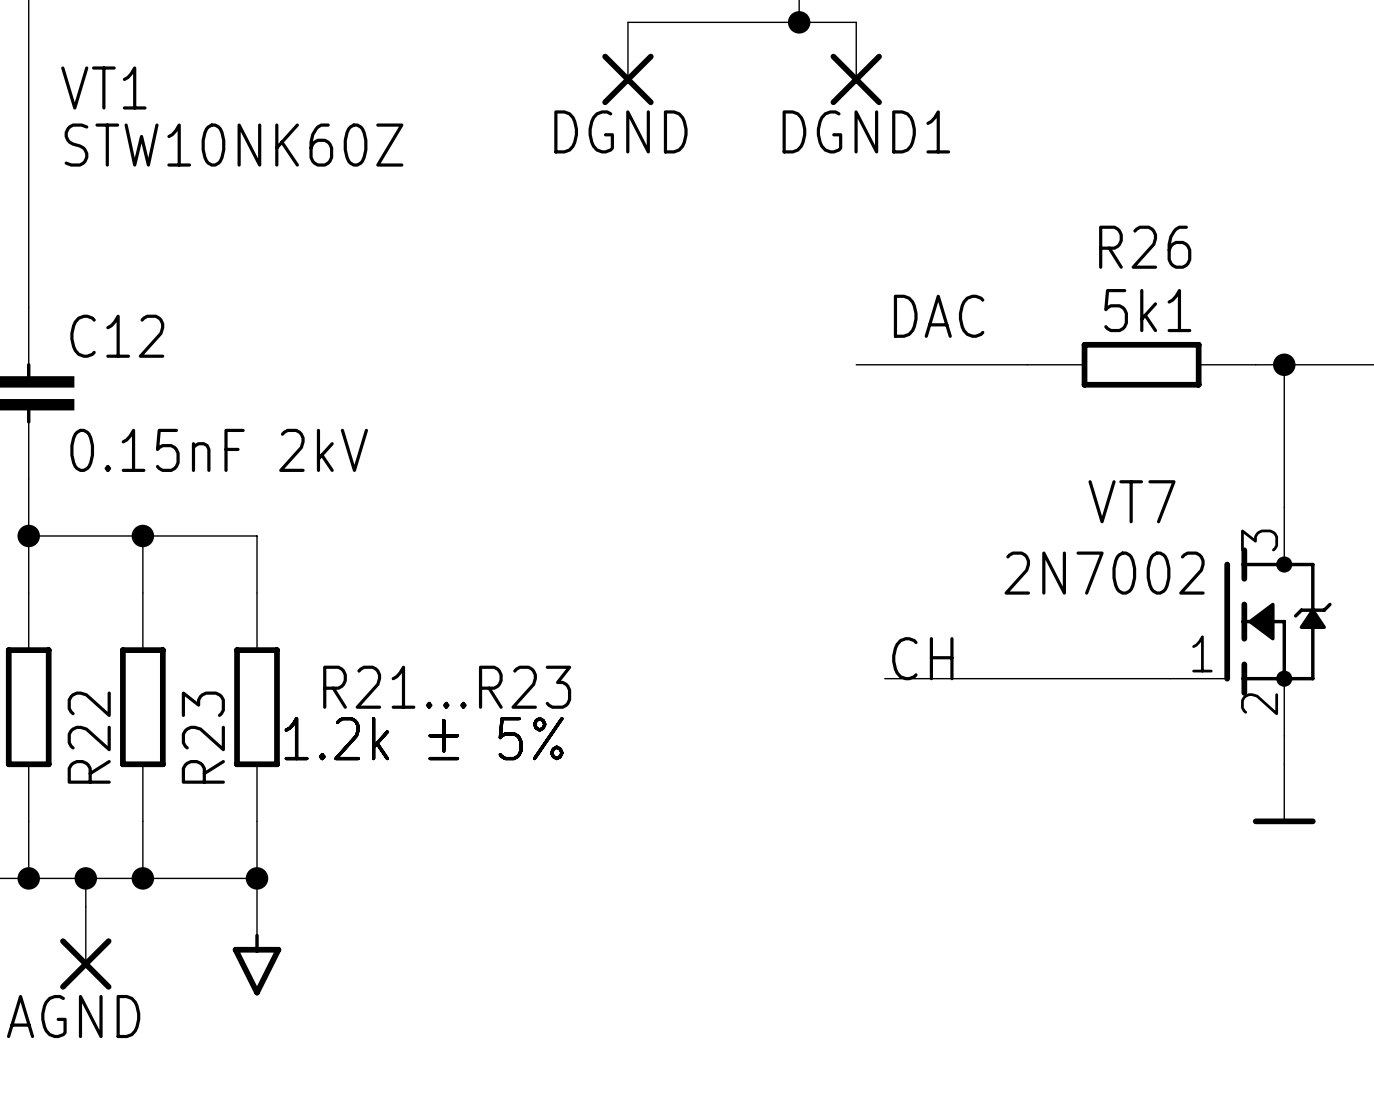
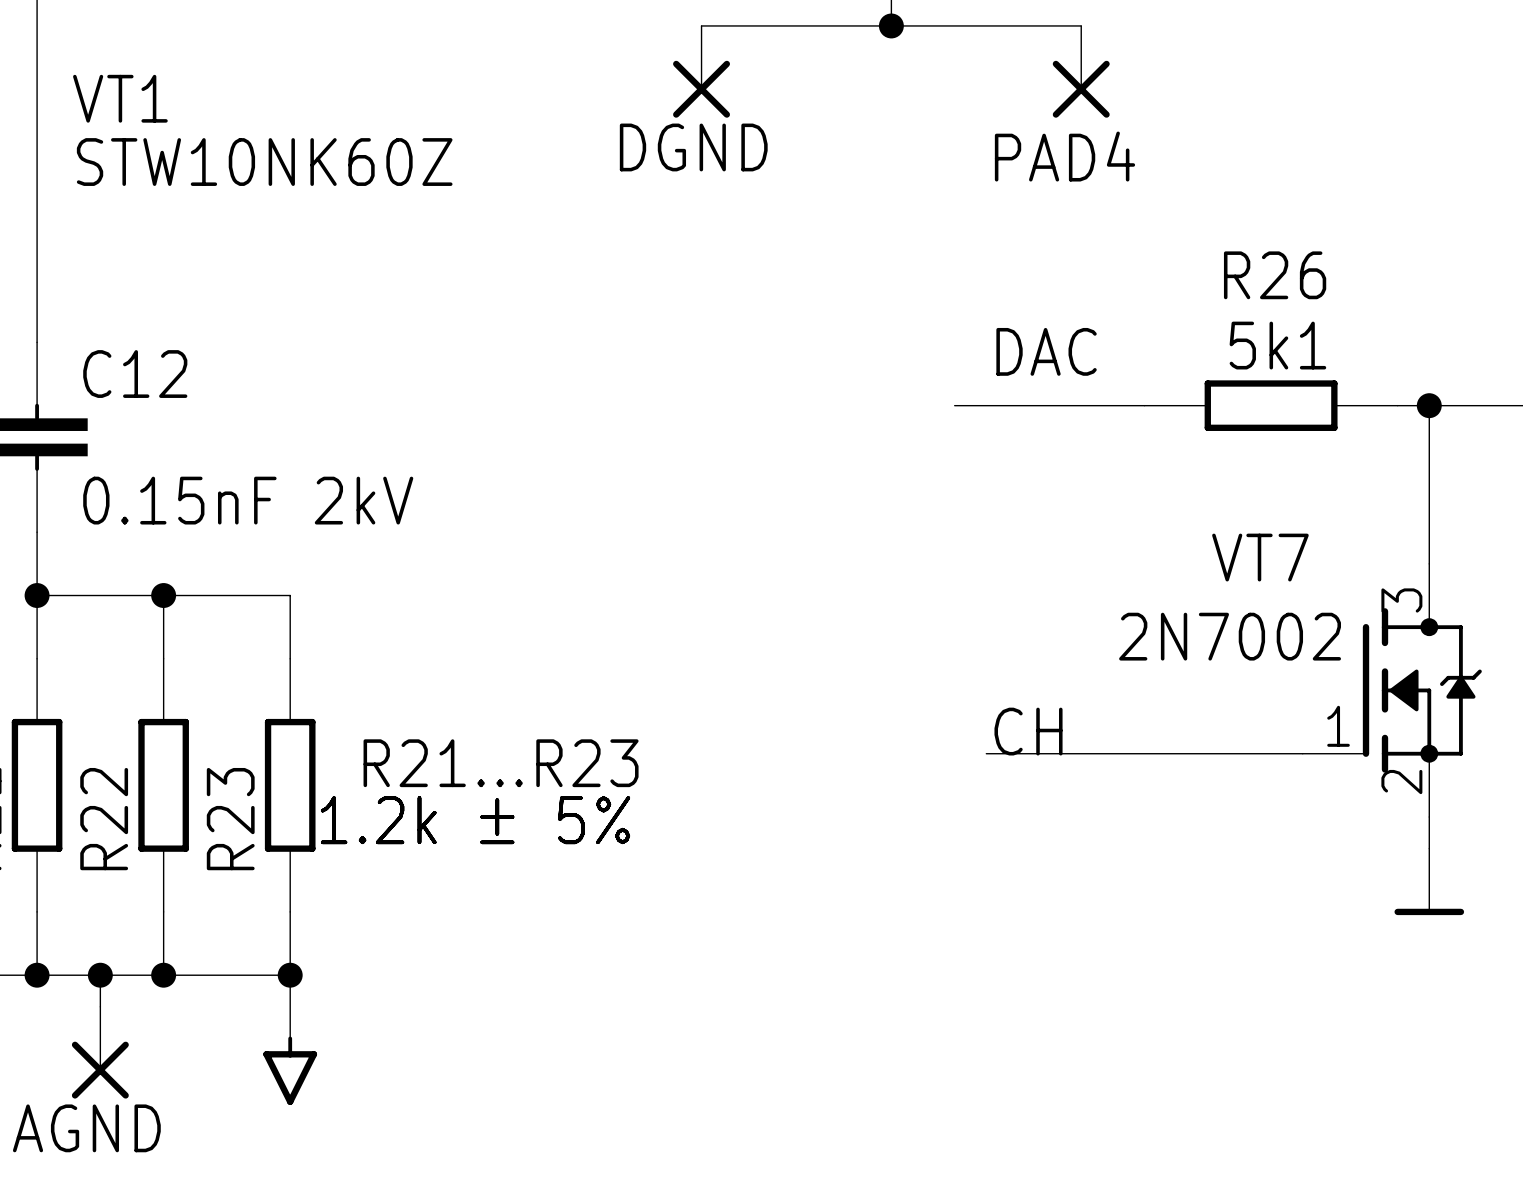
wire: none -> (954, 25) (1081, 25)
DGND1: (856, 63) -> none
PAD4: none -> (1081, 71)

